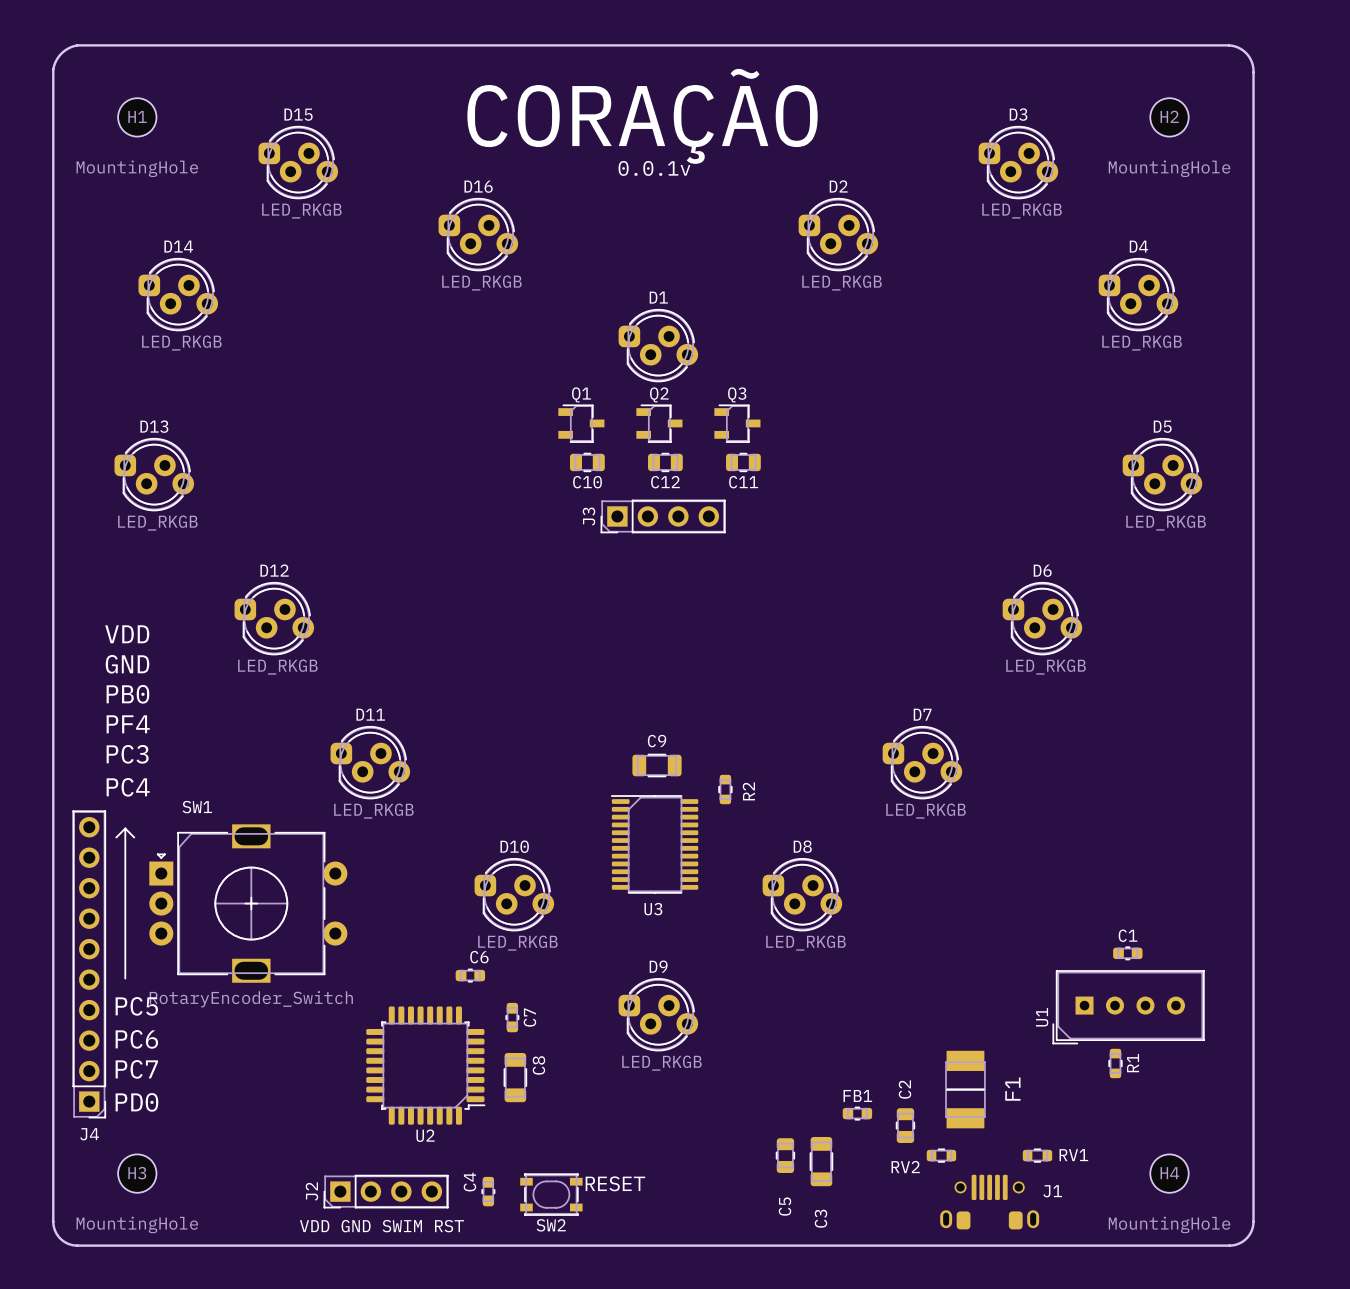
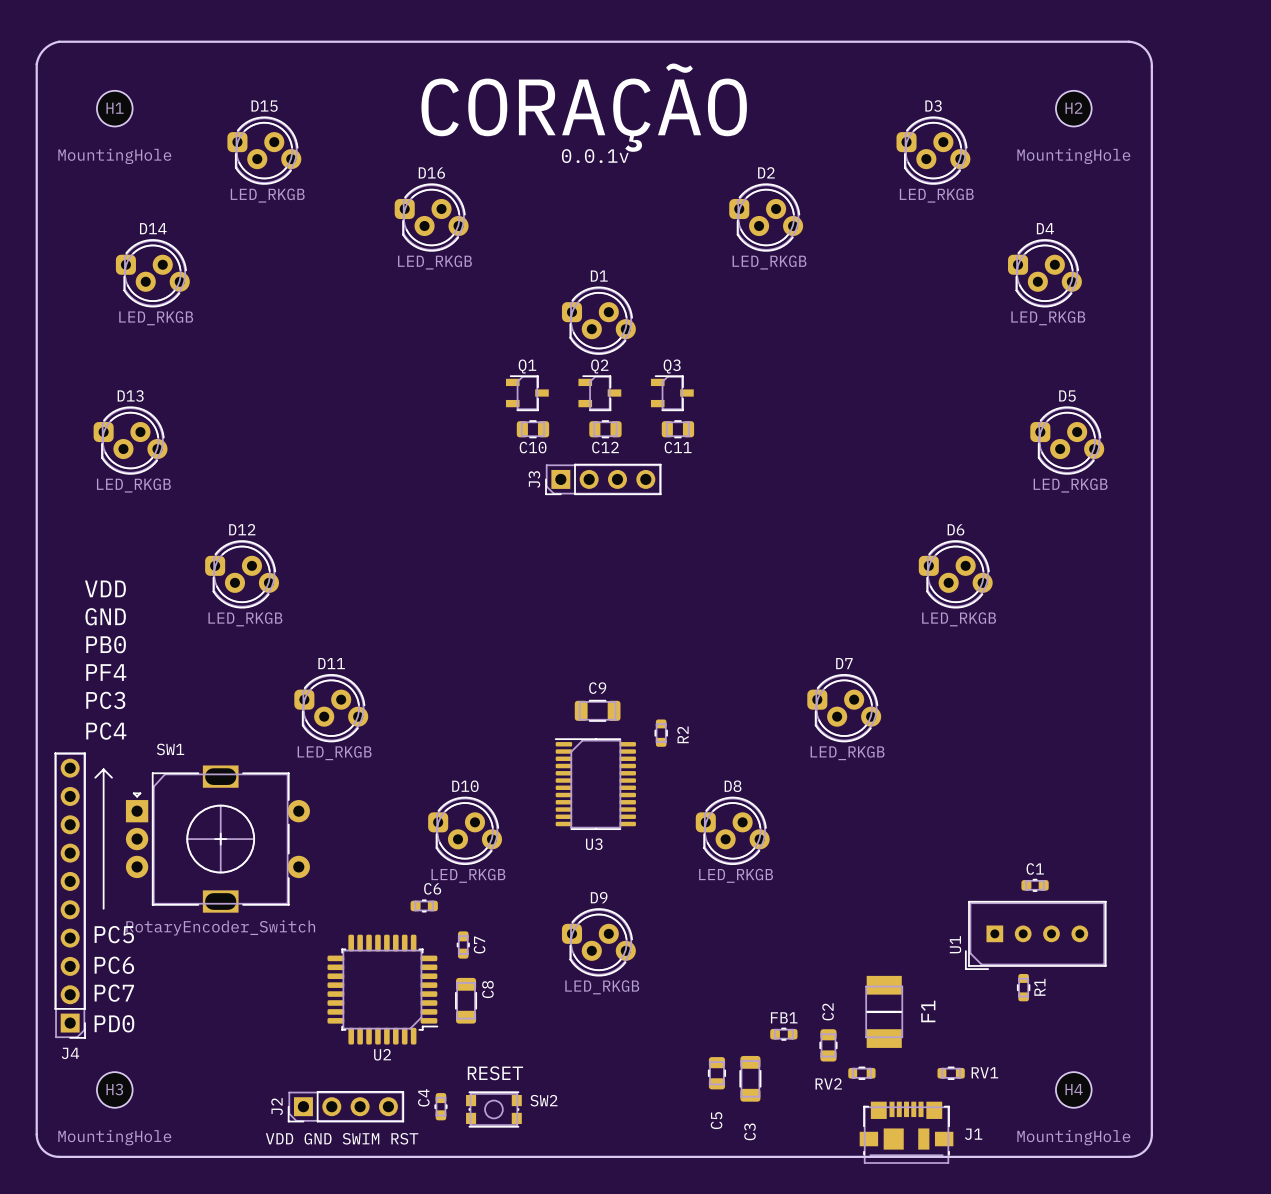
SW2 footprint: [520, 1173, 583, 1216] -> [466, 1091, 522, 1128]
J1 footprint: [940, 1174, 1040, 1230] -> [859, 1101, 954, 1164]
text position: RESET (615, 1183) -> RESET (495, 1073)
SW2 name position: SW2 (551, 1225) -> SW2 (543, 1100)

